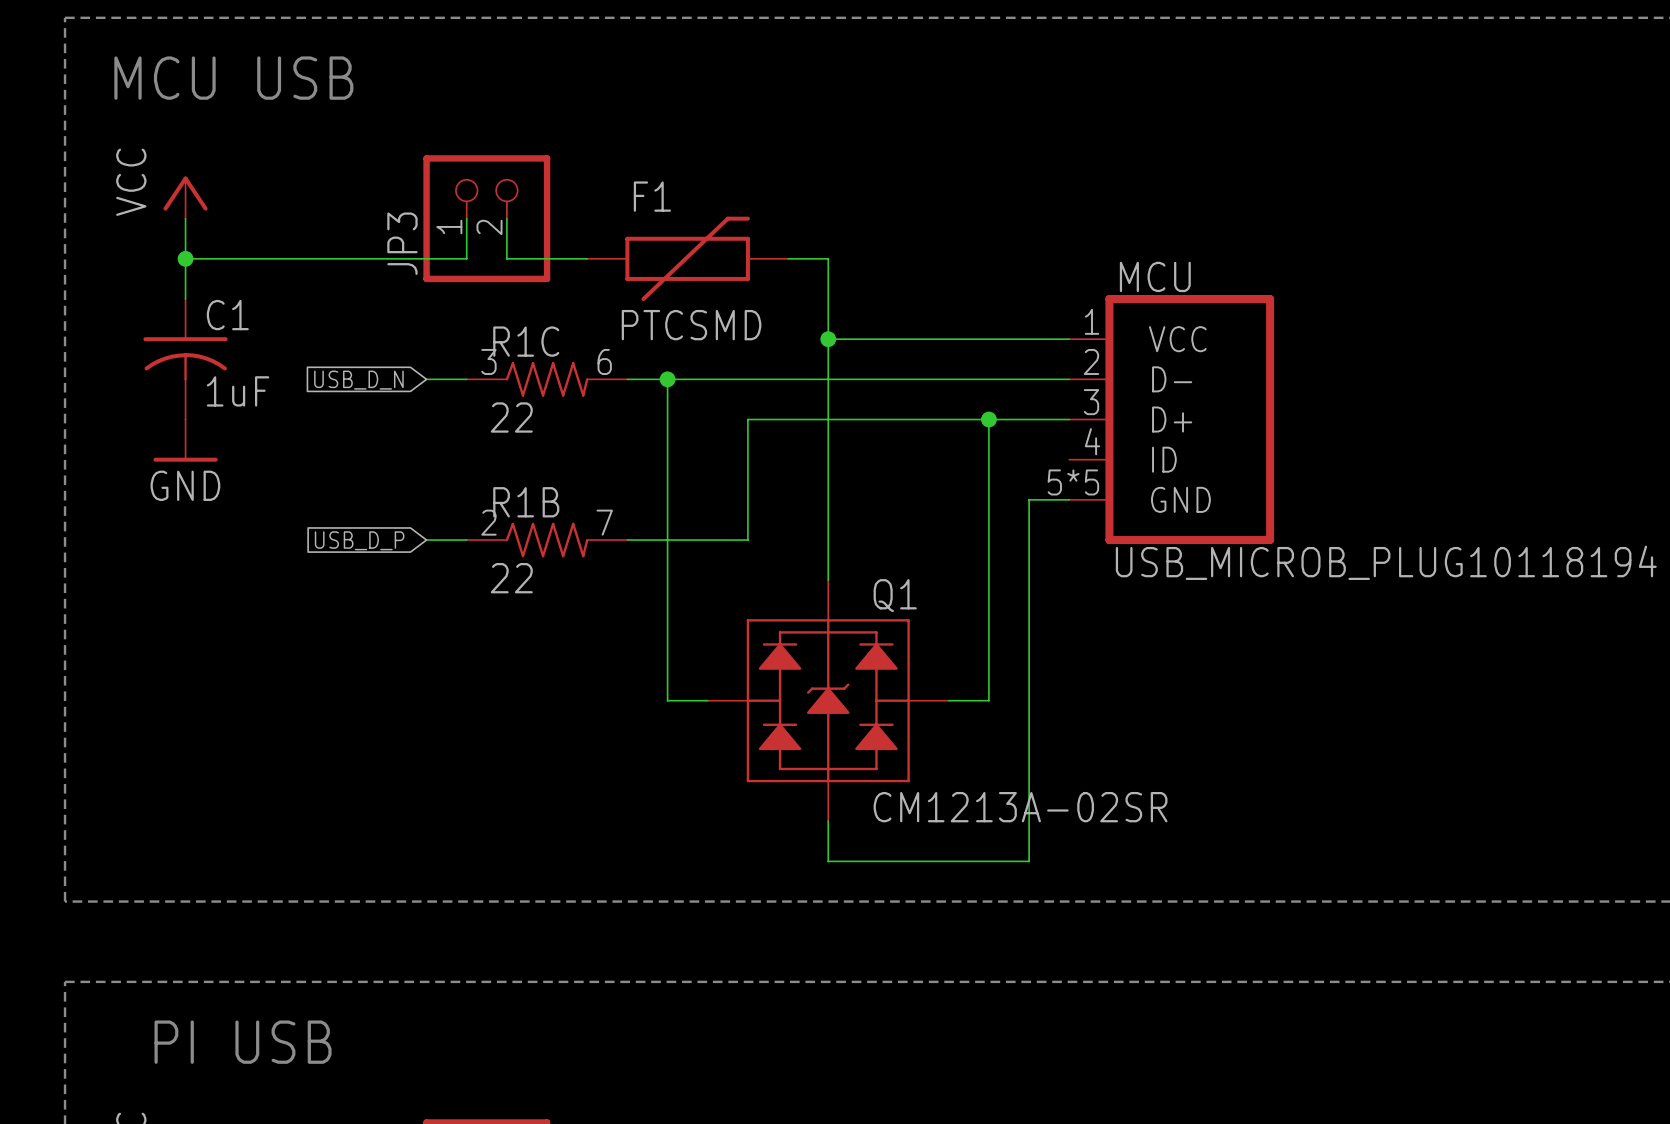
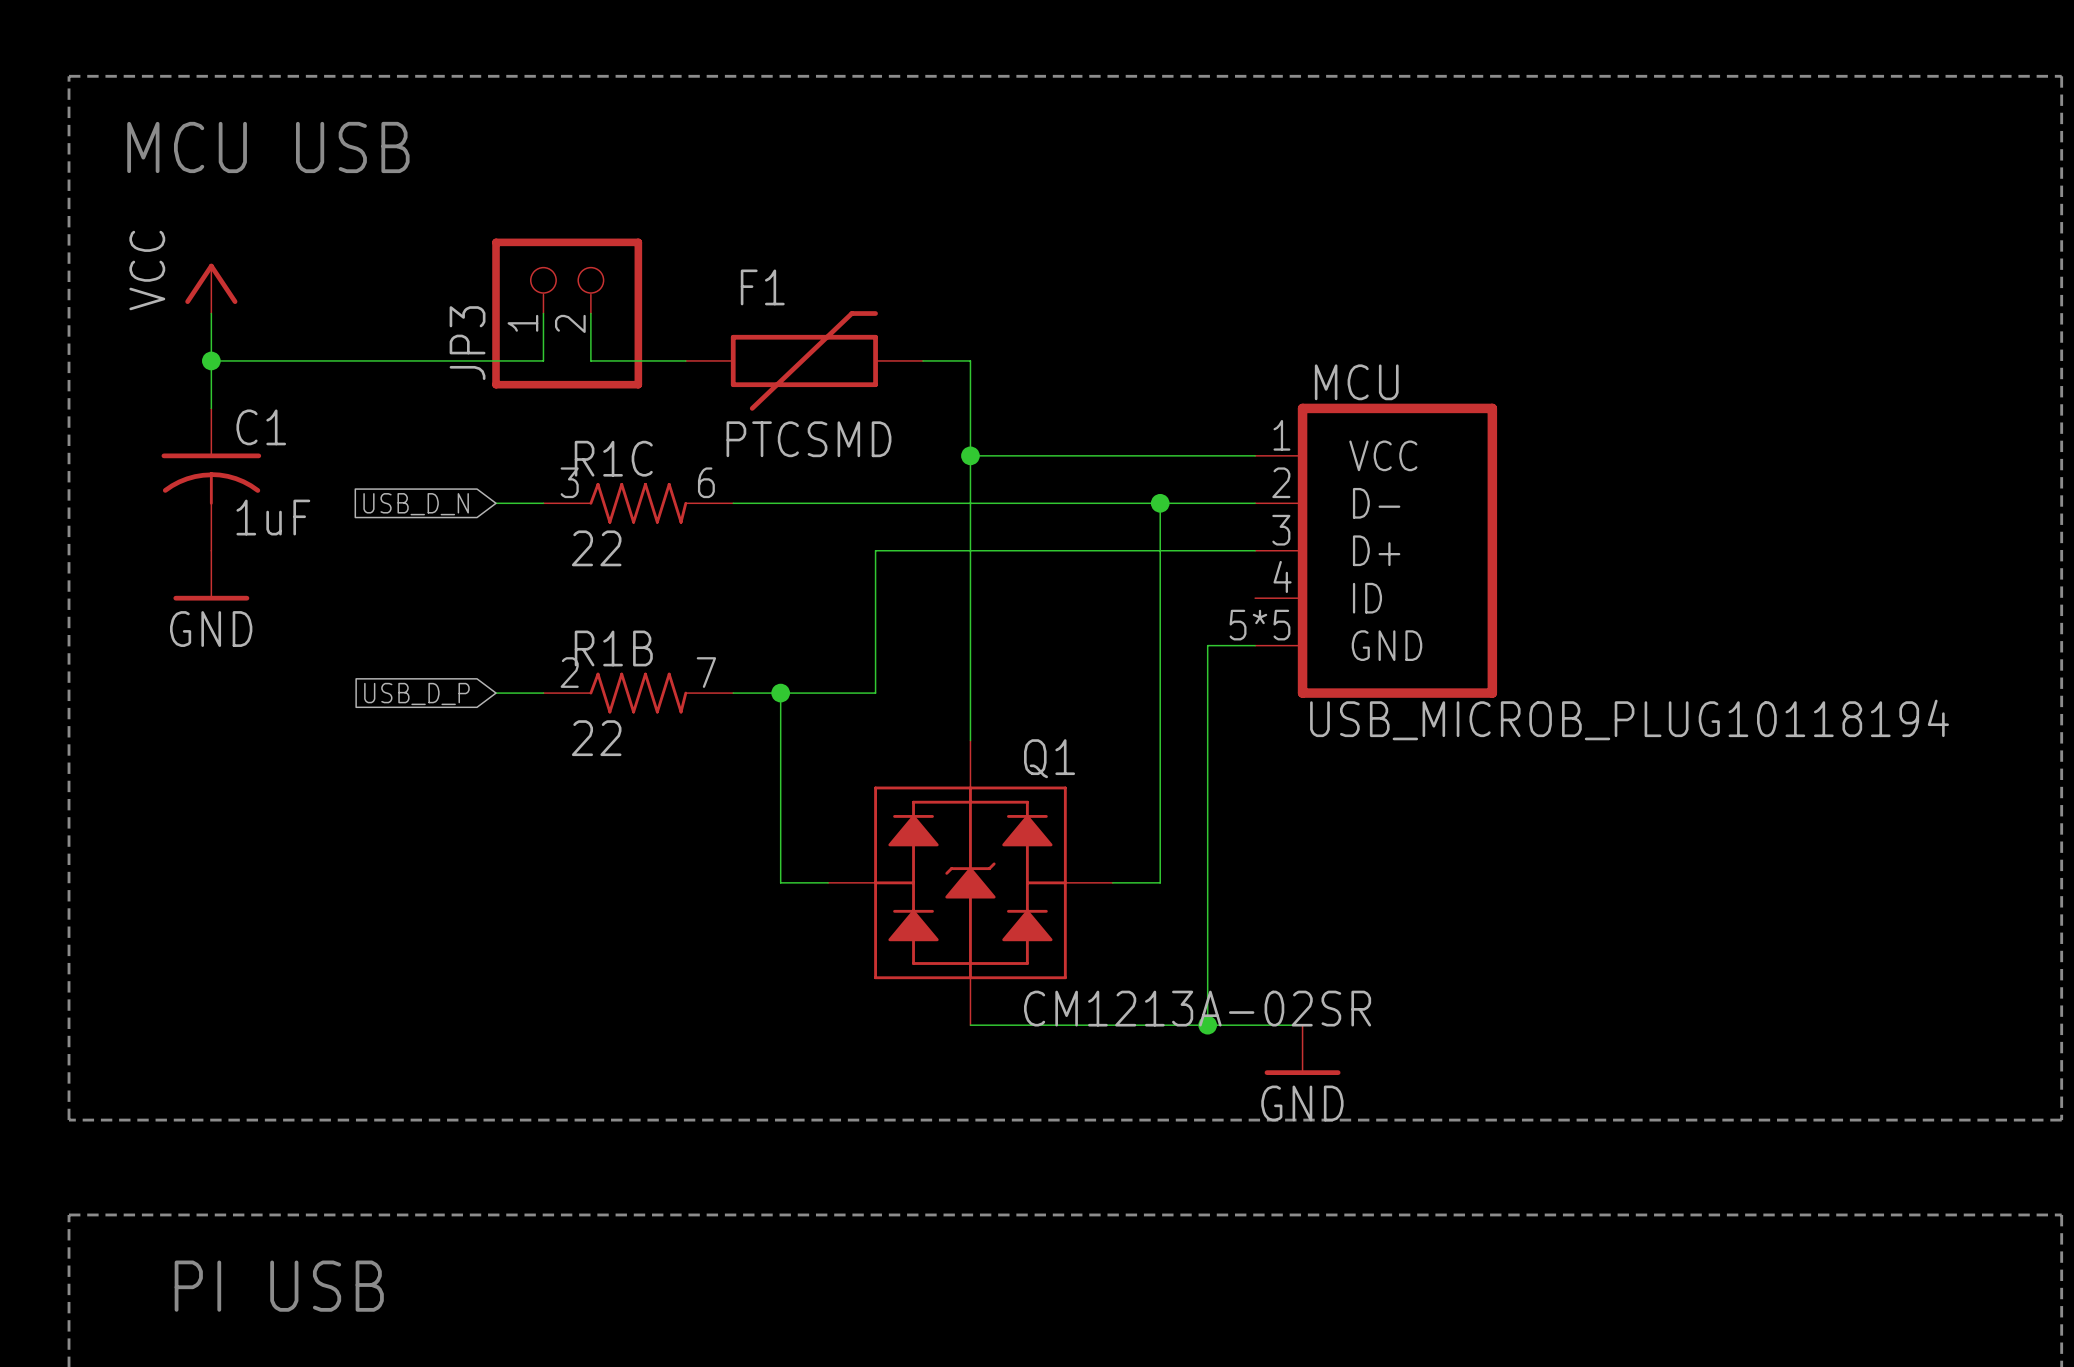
wire: (667, 379) (667, 540) -> none
junction: (667, 379) -> none
wire: none -> (1160, 503) (1160, 550)
junction position: (988, 419) -> (1160, 503)
junction: none -> (780, 693)
wire: (828, 821) (828, 861) (1029, 861) (1029, 821) -> (970, 1025) (1302, 1025)
junction: none -> (1207, 1025)
power symbol: none -> GND (1302, 1050)

